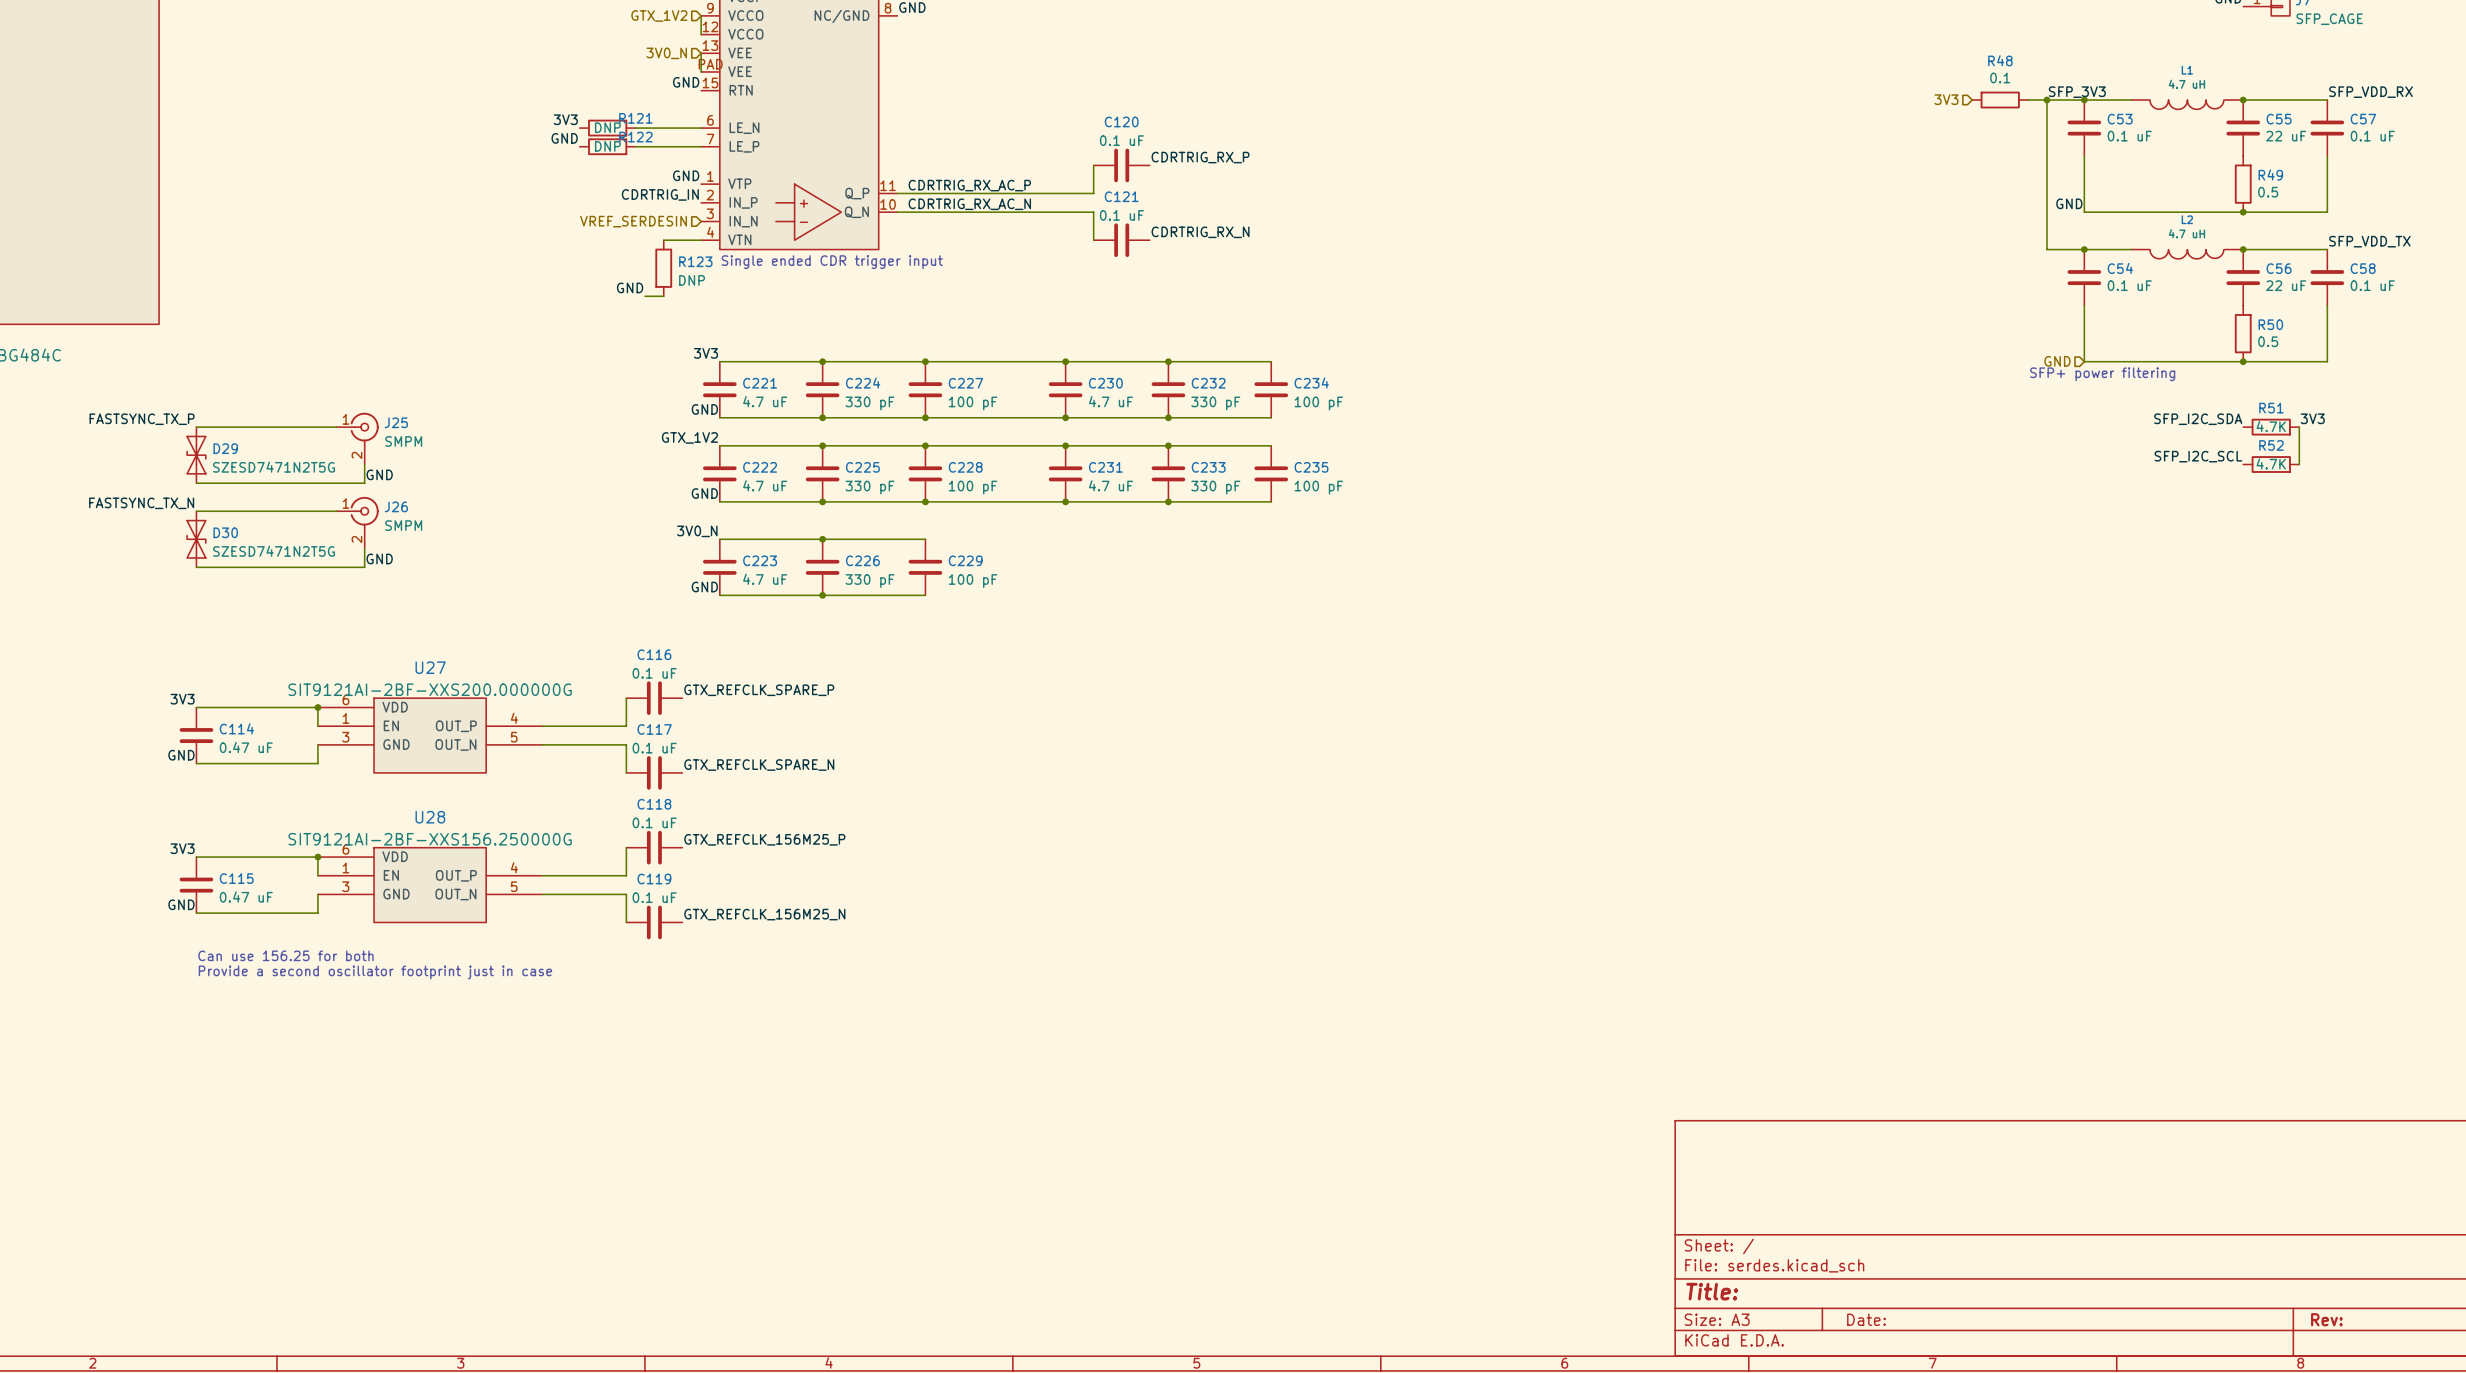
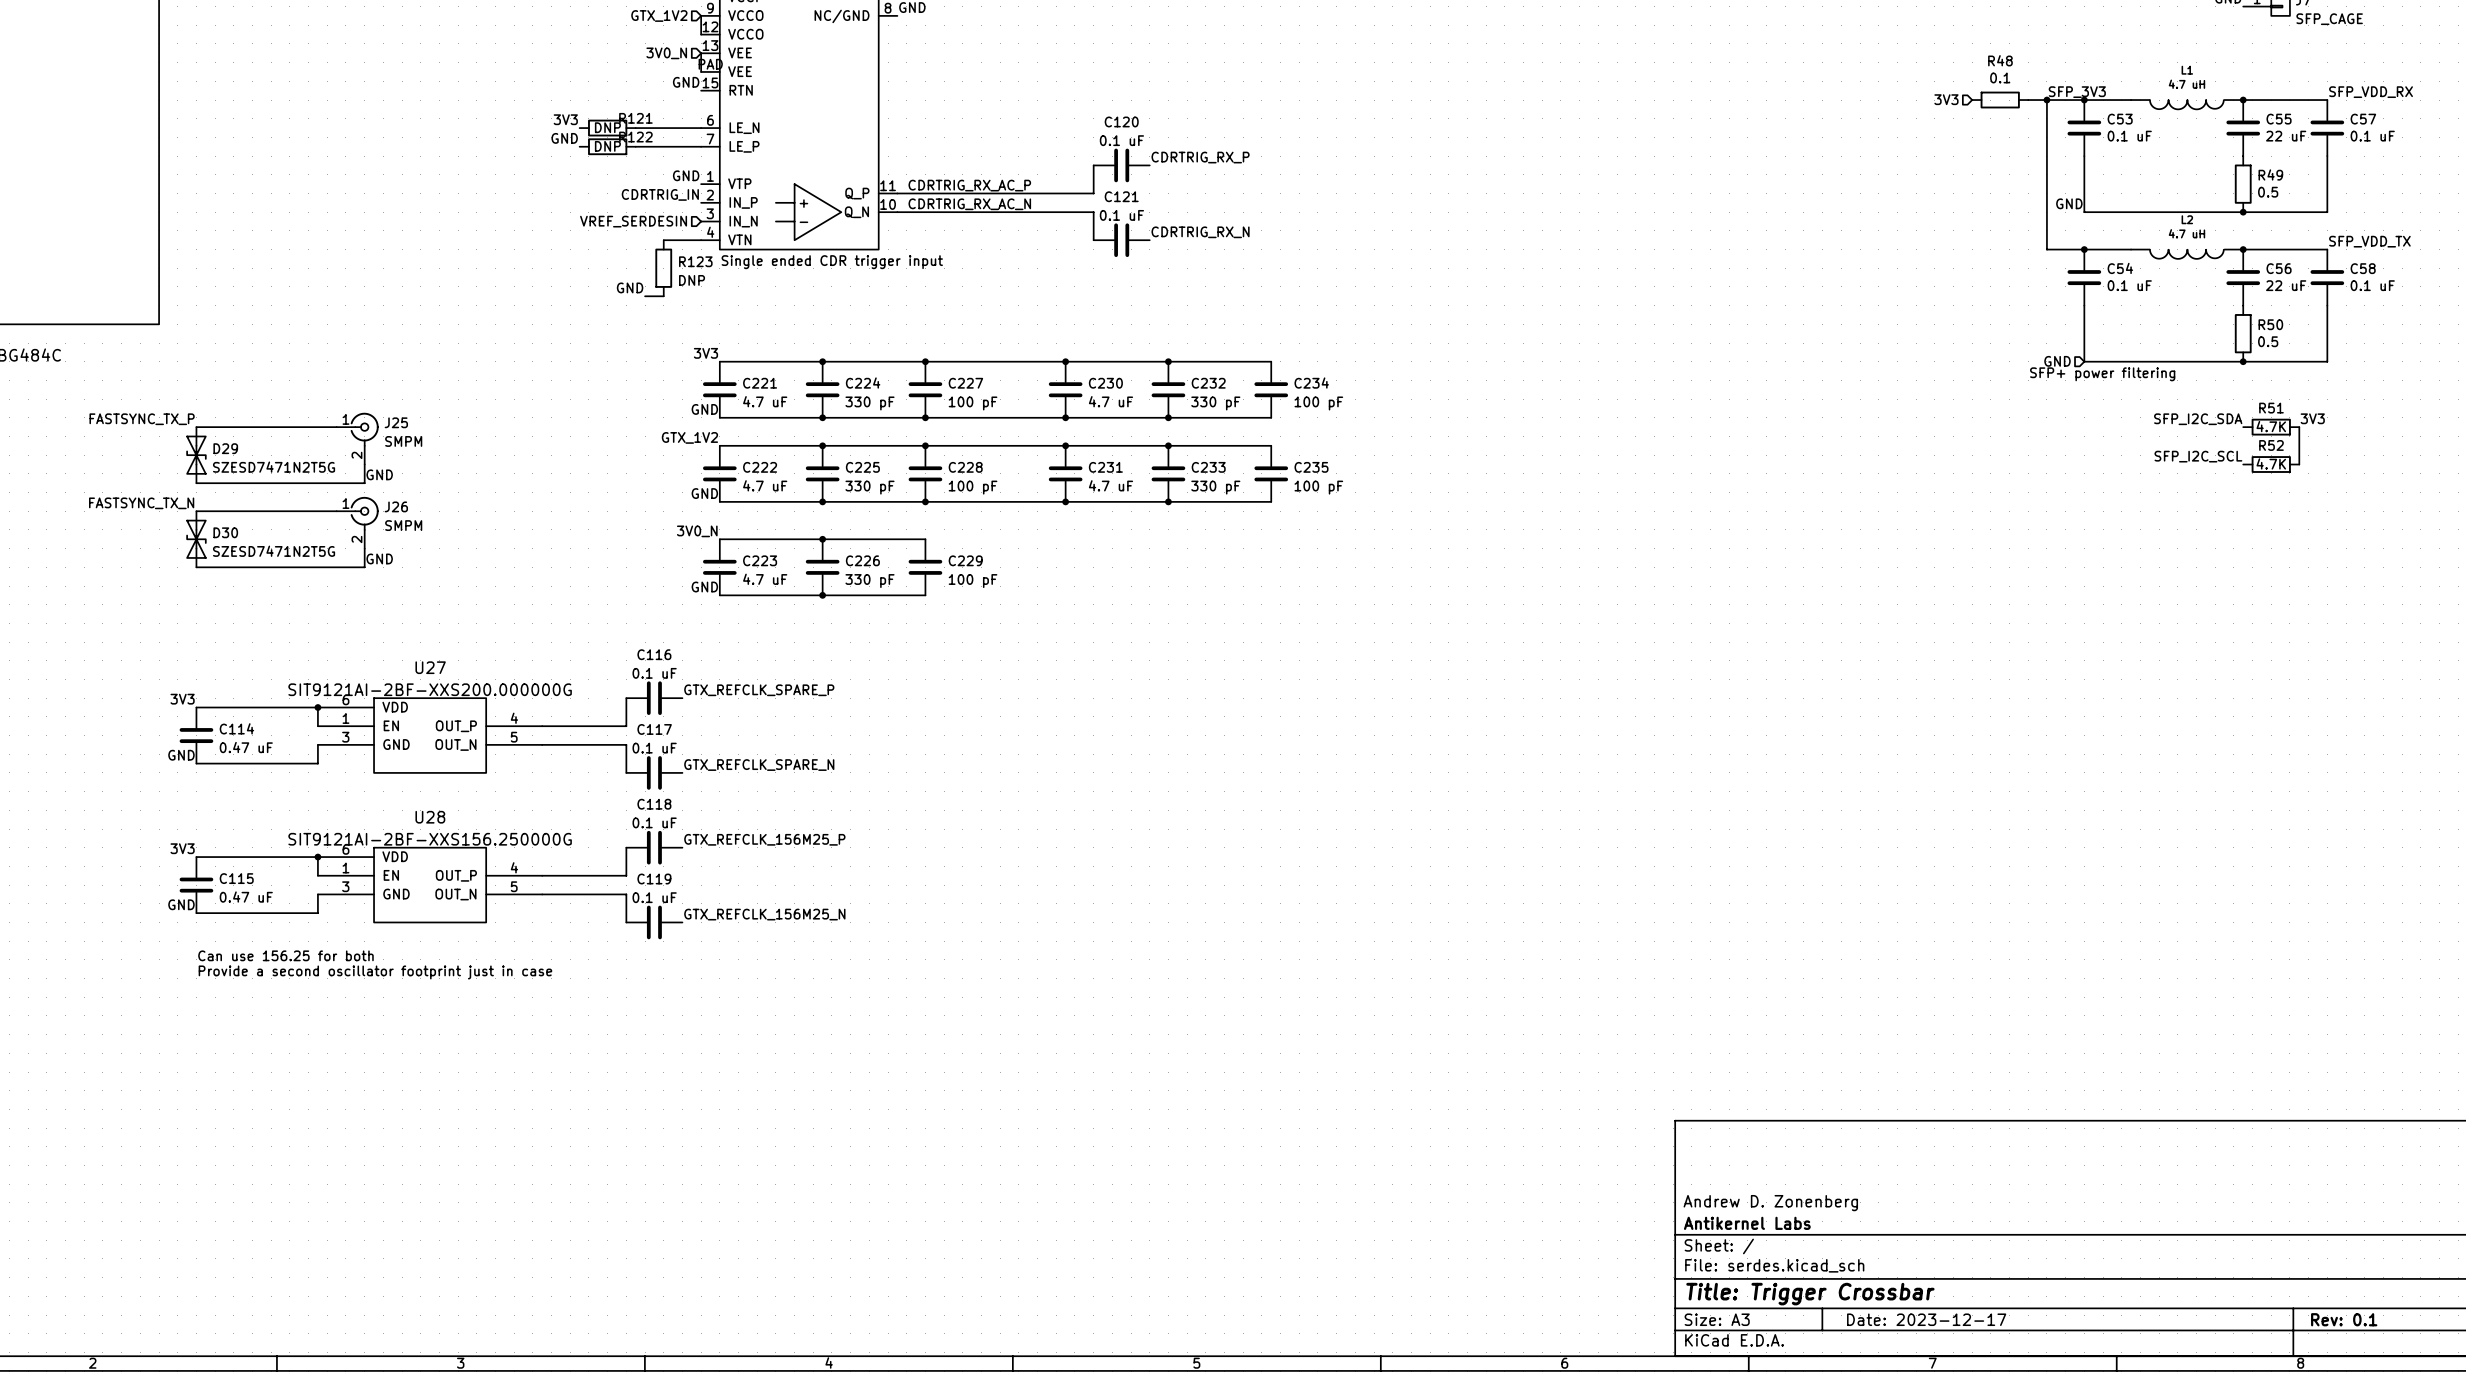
title block: none -> Andrew D. Zonenberg (1770, 1203)
title block: none -> Antikernel Labs (1747, 1223)
title block: Title: (1712, 1291) -> Title: Trigger Crossbar (1810, 1294)
title block: Date: (1866, 1319) -> Date: 2023-12-17 (1926, 1319)
title block: Rev: (2326, 1319) -> Rev: 0.1 (2344, 1319)

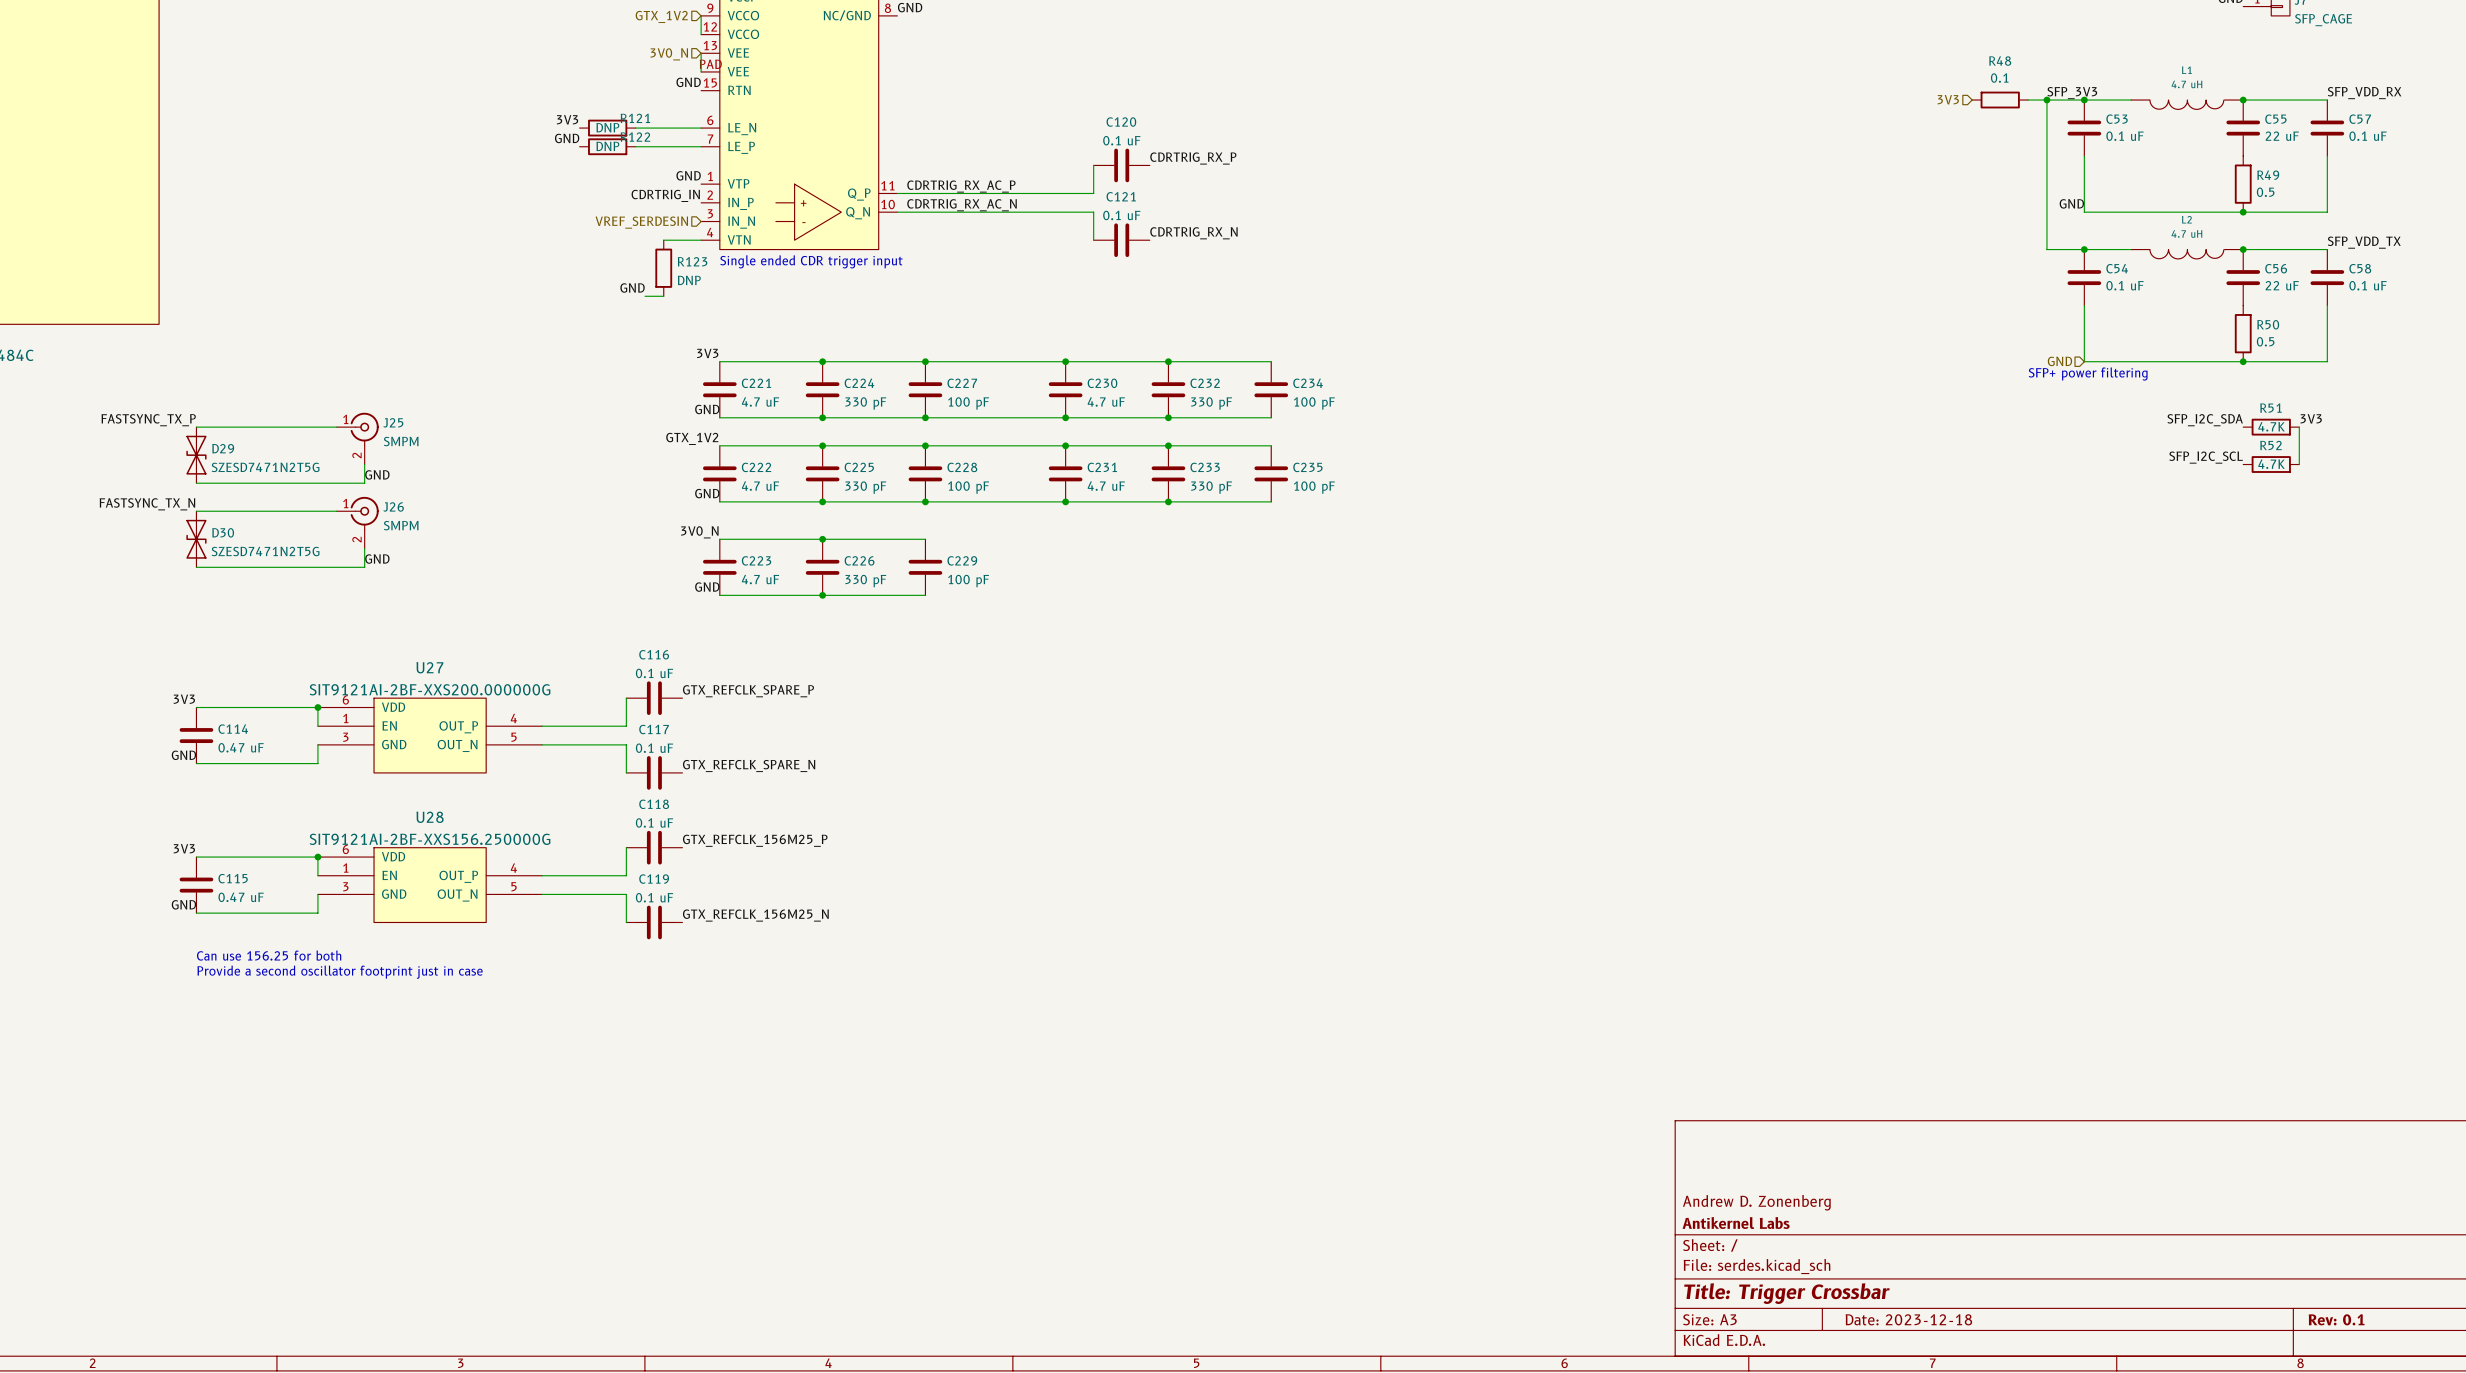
title block: Date: 2023-12-17 (1926, 1319) -> Date: 2023-12-18 (1908, 1319)

